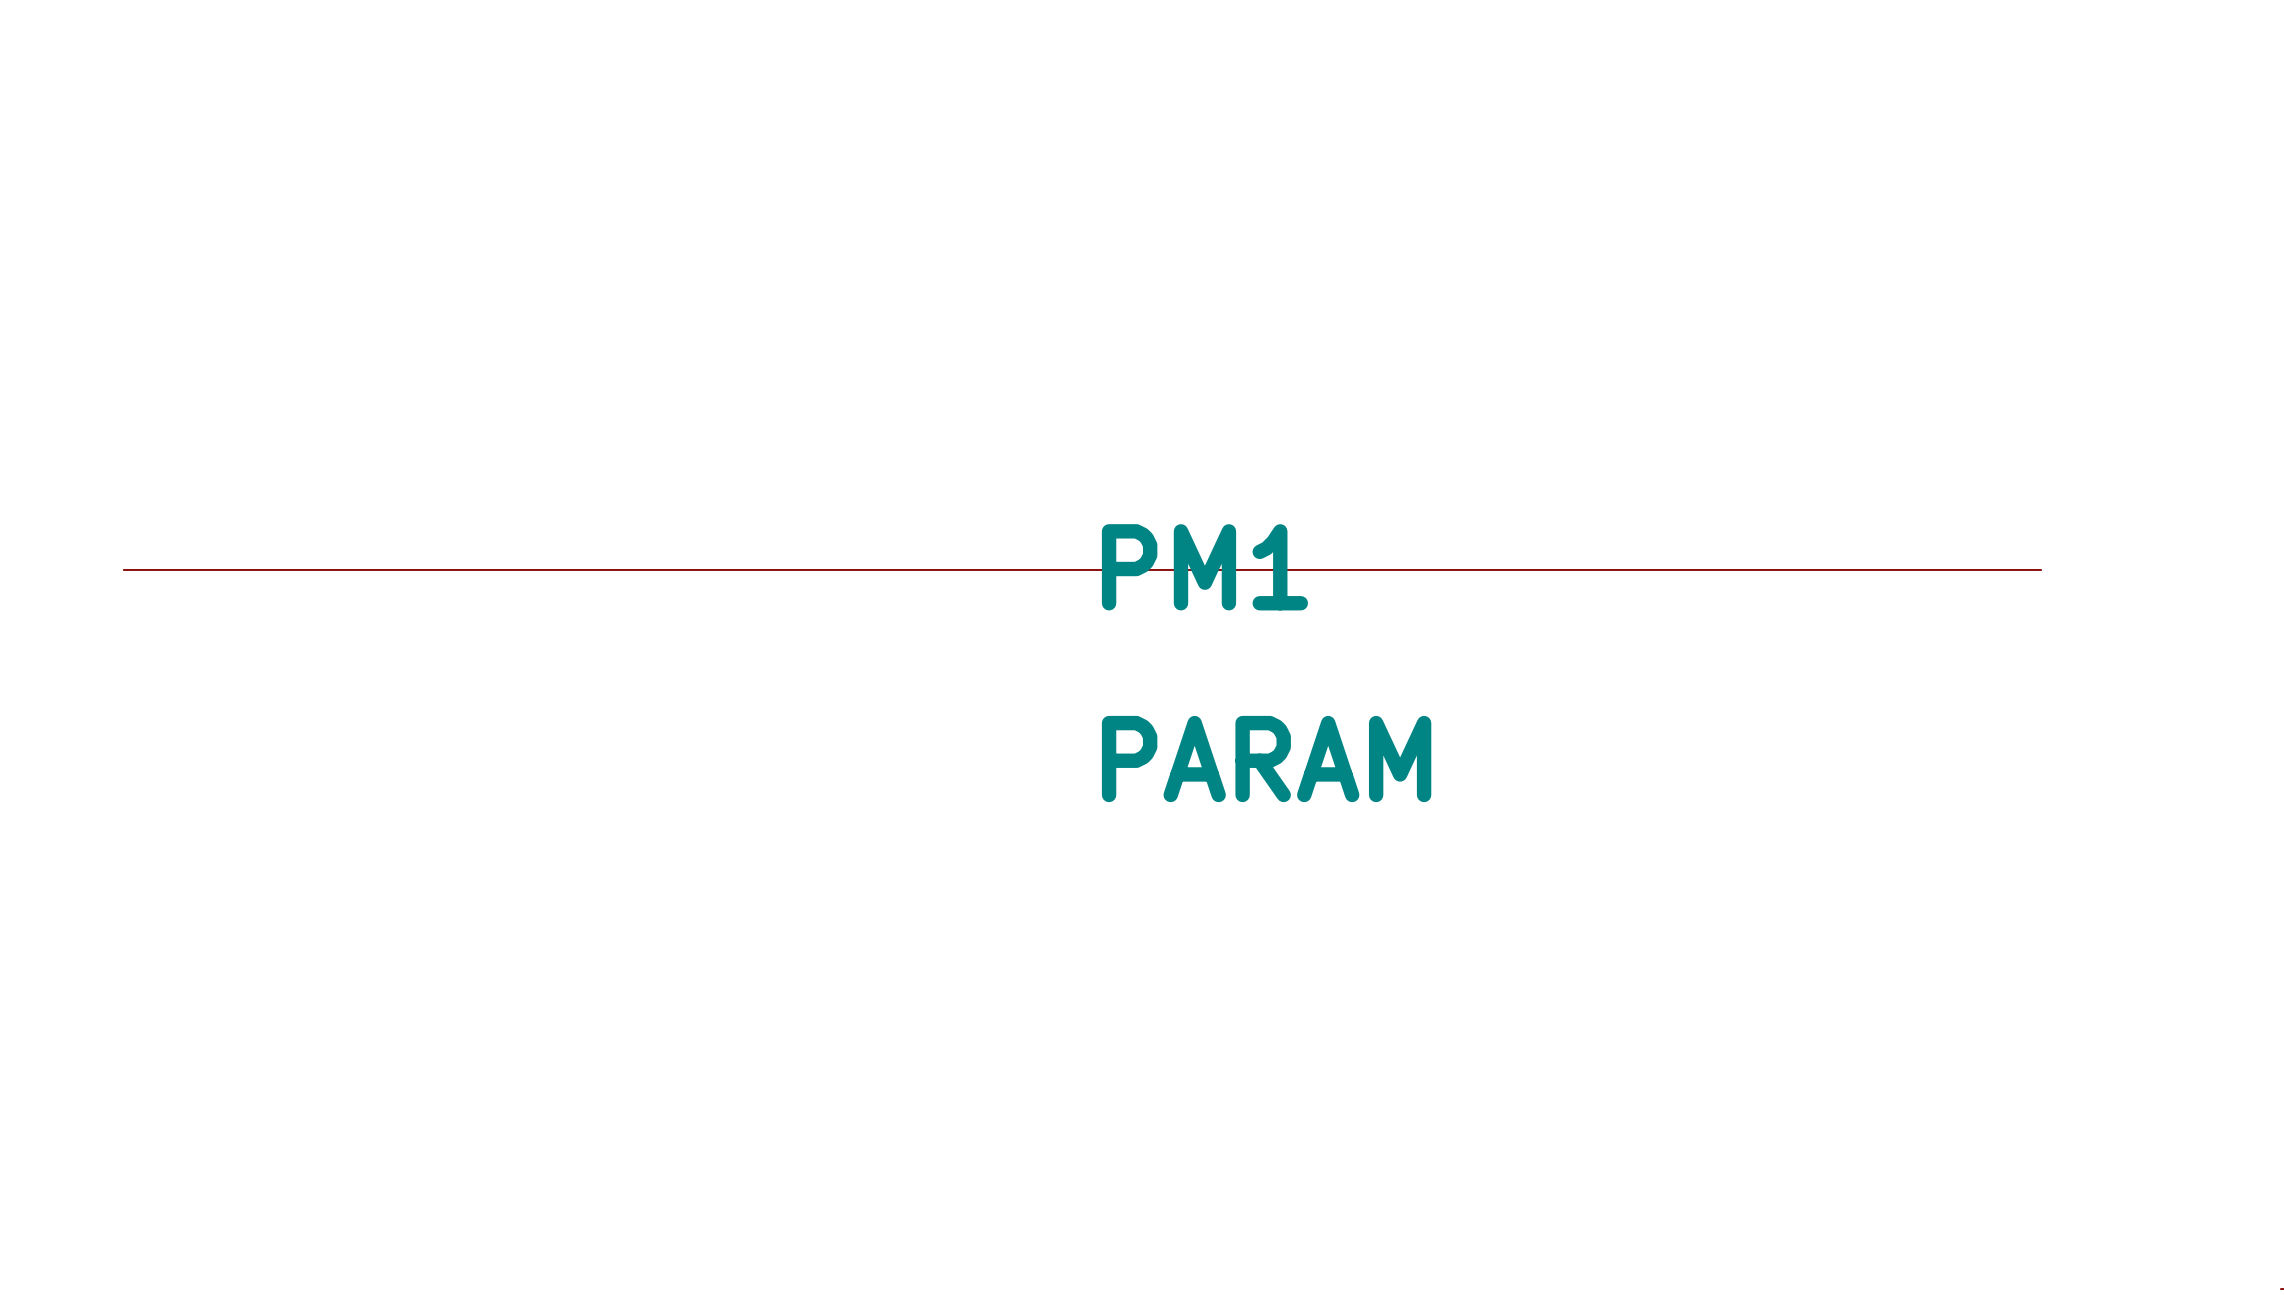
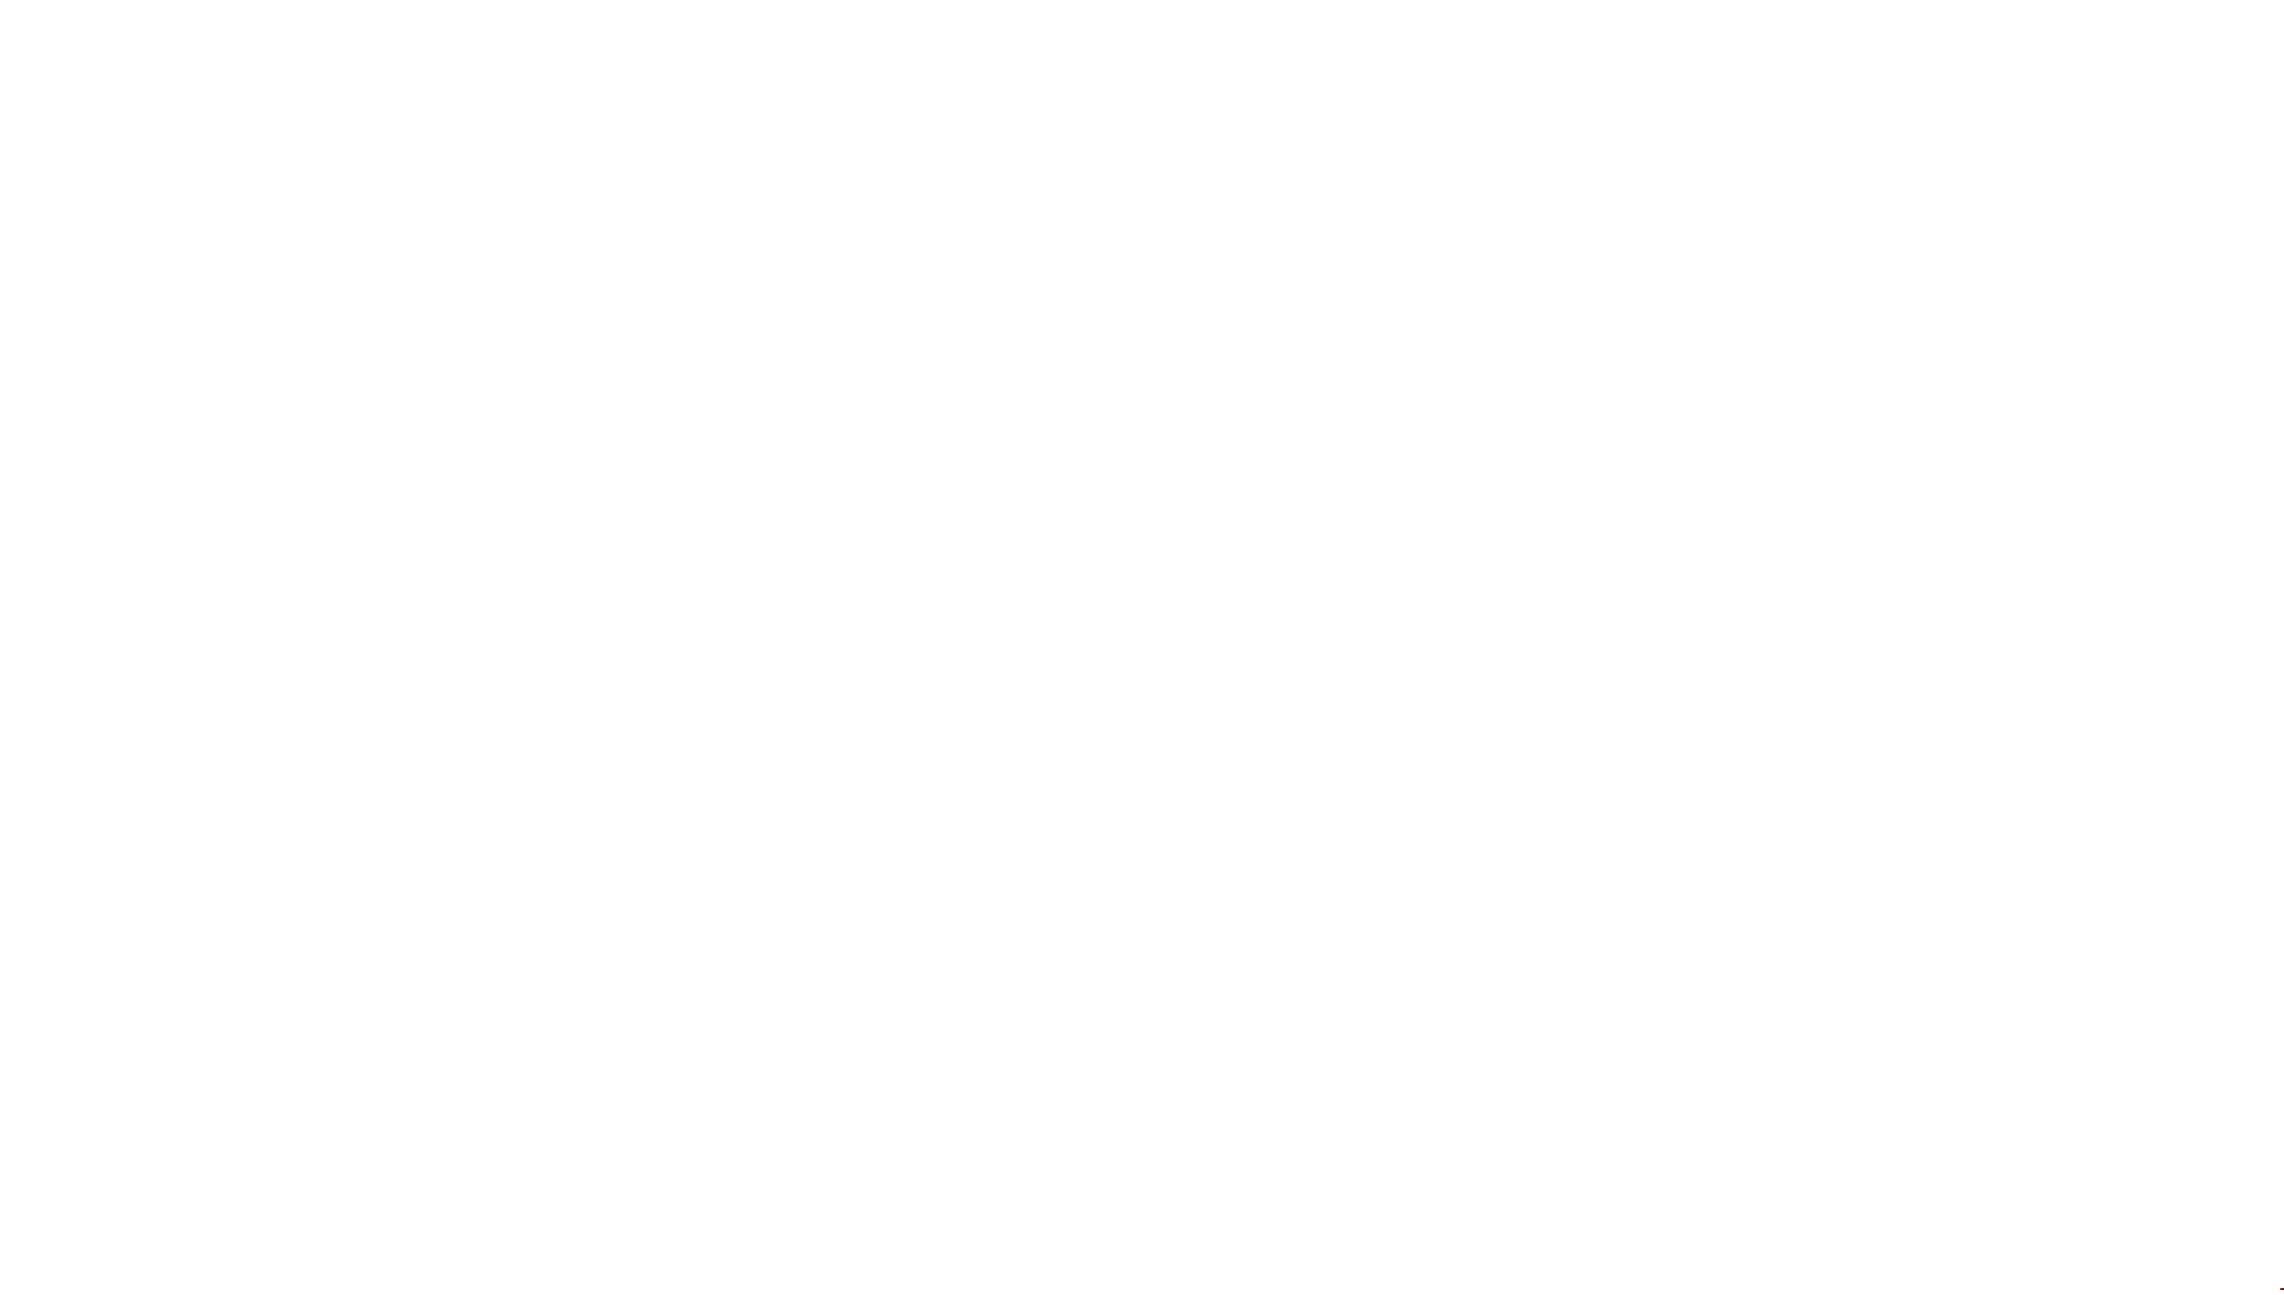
PM1: PARAM (1082, 569) -> none

